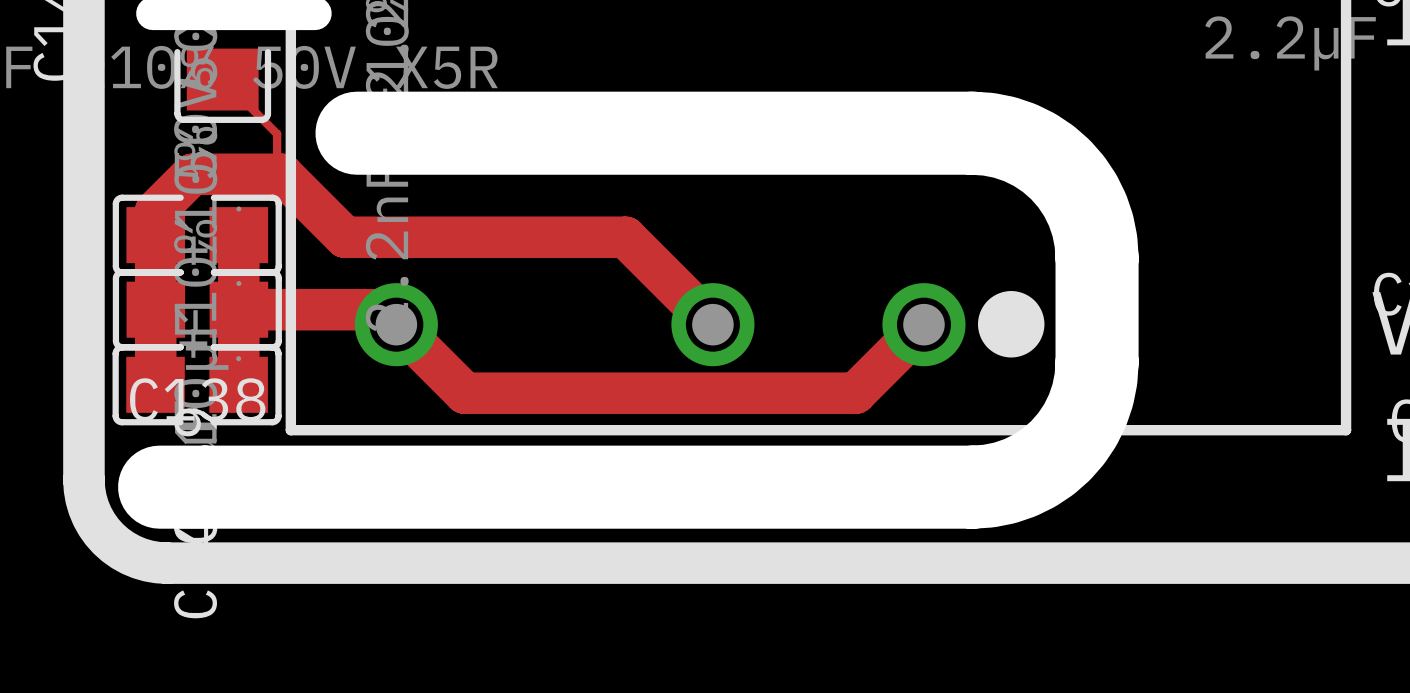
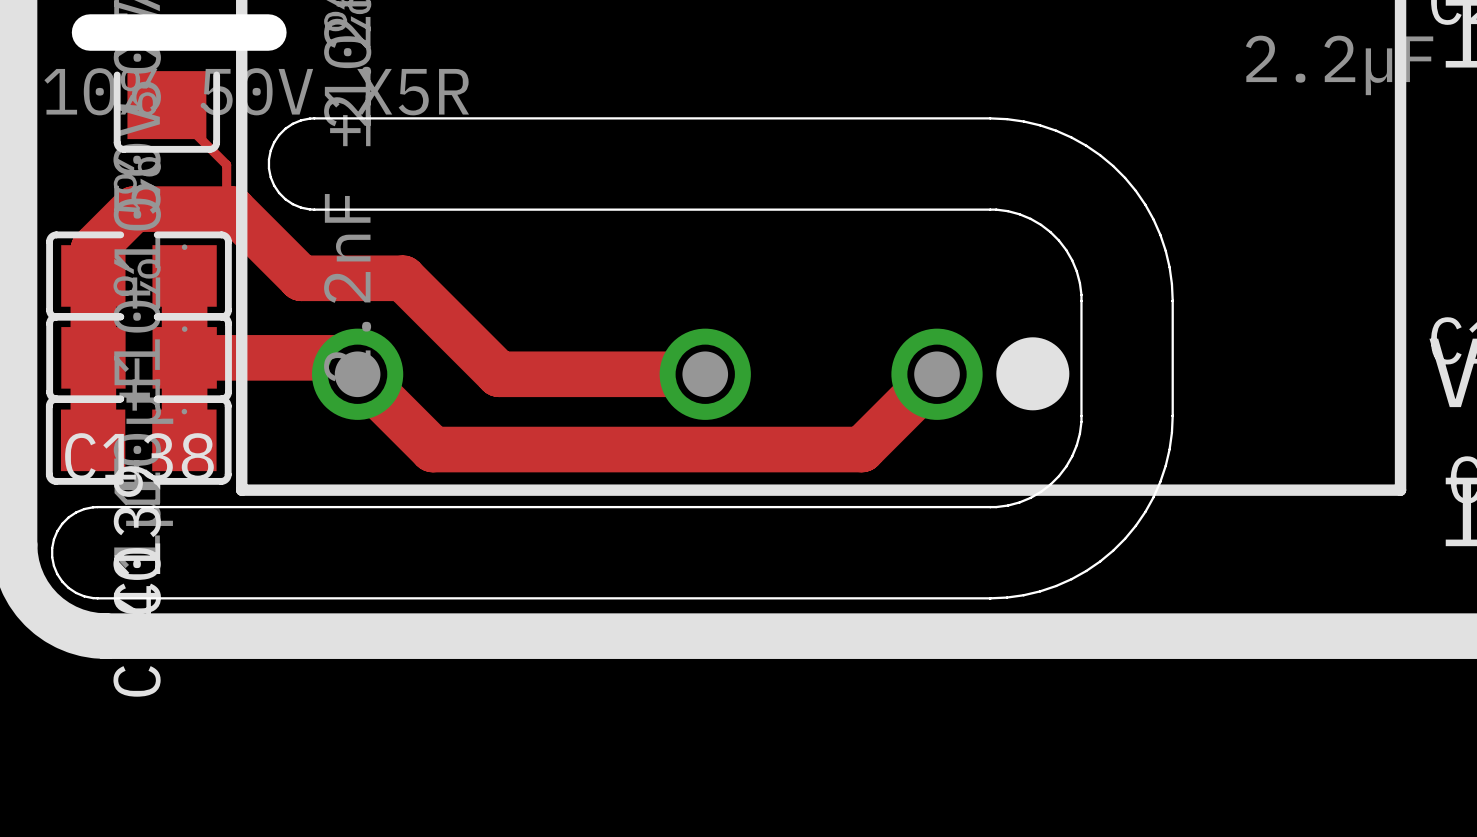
board edge: (357, 133) (972, 133) (1004, 137) (1020, 142) (1048, 158) (1071, 181) (1080, 195) (1092, 225) (1097, 257) (1097, 362) (1092, 394) (1087, 410) (1071, 438) (1048, 461) (1020, 477) (988, 486) (159, 487) -> none
track: (437, 237) (625, 237) (712, 324) -> (403, 278) (499, 374) (705, 374)
board edge: none -> (990, 598) (93, 598) (76, 592) (62, 581) (53, 565) (52, 548) (57, 531) (68, 517) (76, 512) (93, 507) (996, 507) (1008, 505) (1030, 497) (1050, 484) (1066, 466) (1072, 456) (1079, 433) (1081, 294) (1076, 271) (1066, 250) (1050, 232) (1030, 218) (1019, 214) (996, 209) (309, 209) (292, 204) (285, 199) (274, 185) (268, 168) (270, 150) (279, 135) (292, 123) (309, 118) (1007, 119) (1023, 121) (1056, 130) (1086, 145) (1113, 166) (1125, 177) (1145, 204) (1160, 234) (1169, 267) (1171, 284) (1172, 415) (1169, 449) (1160, 481) (1145, 511) (1125, 538) (1100, 561) (1071, 579) (1040, 591) (1023, 595) (990, 598)

